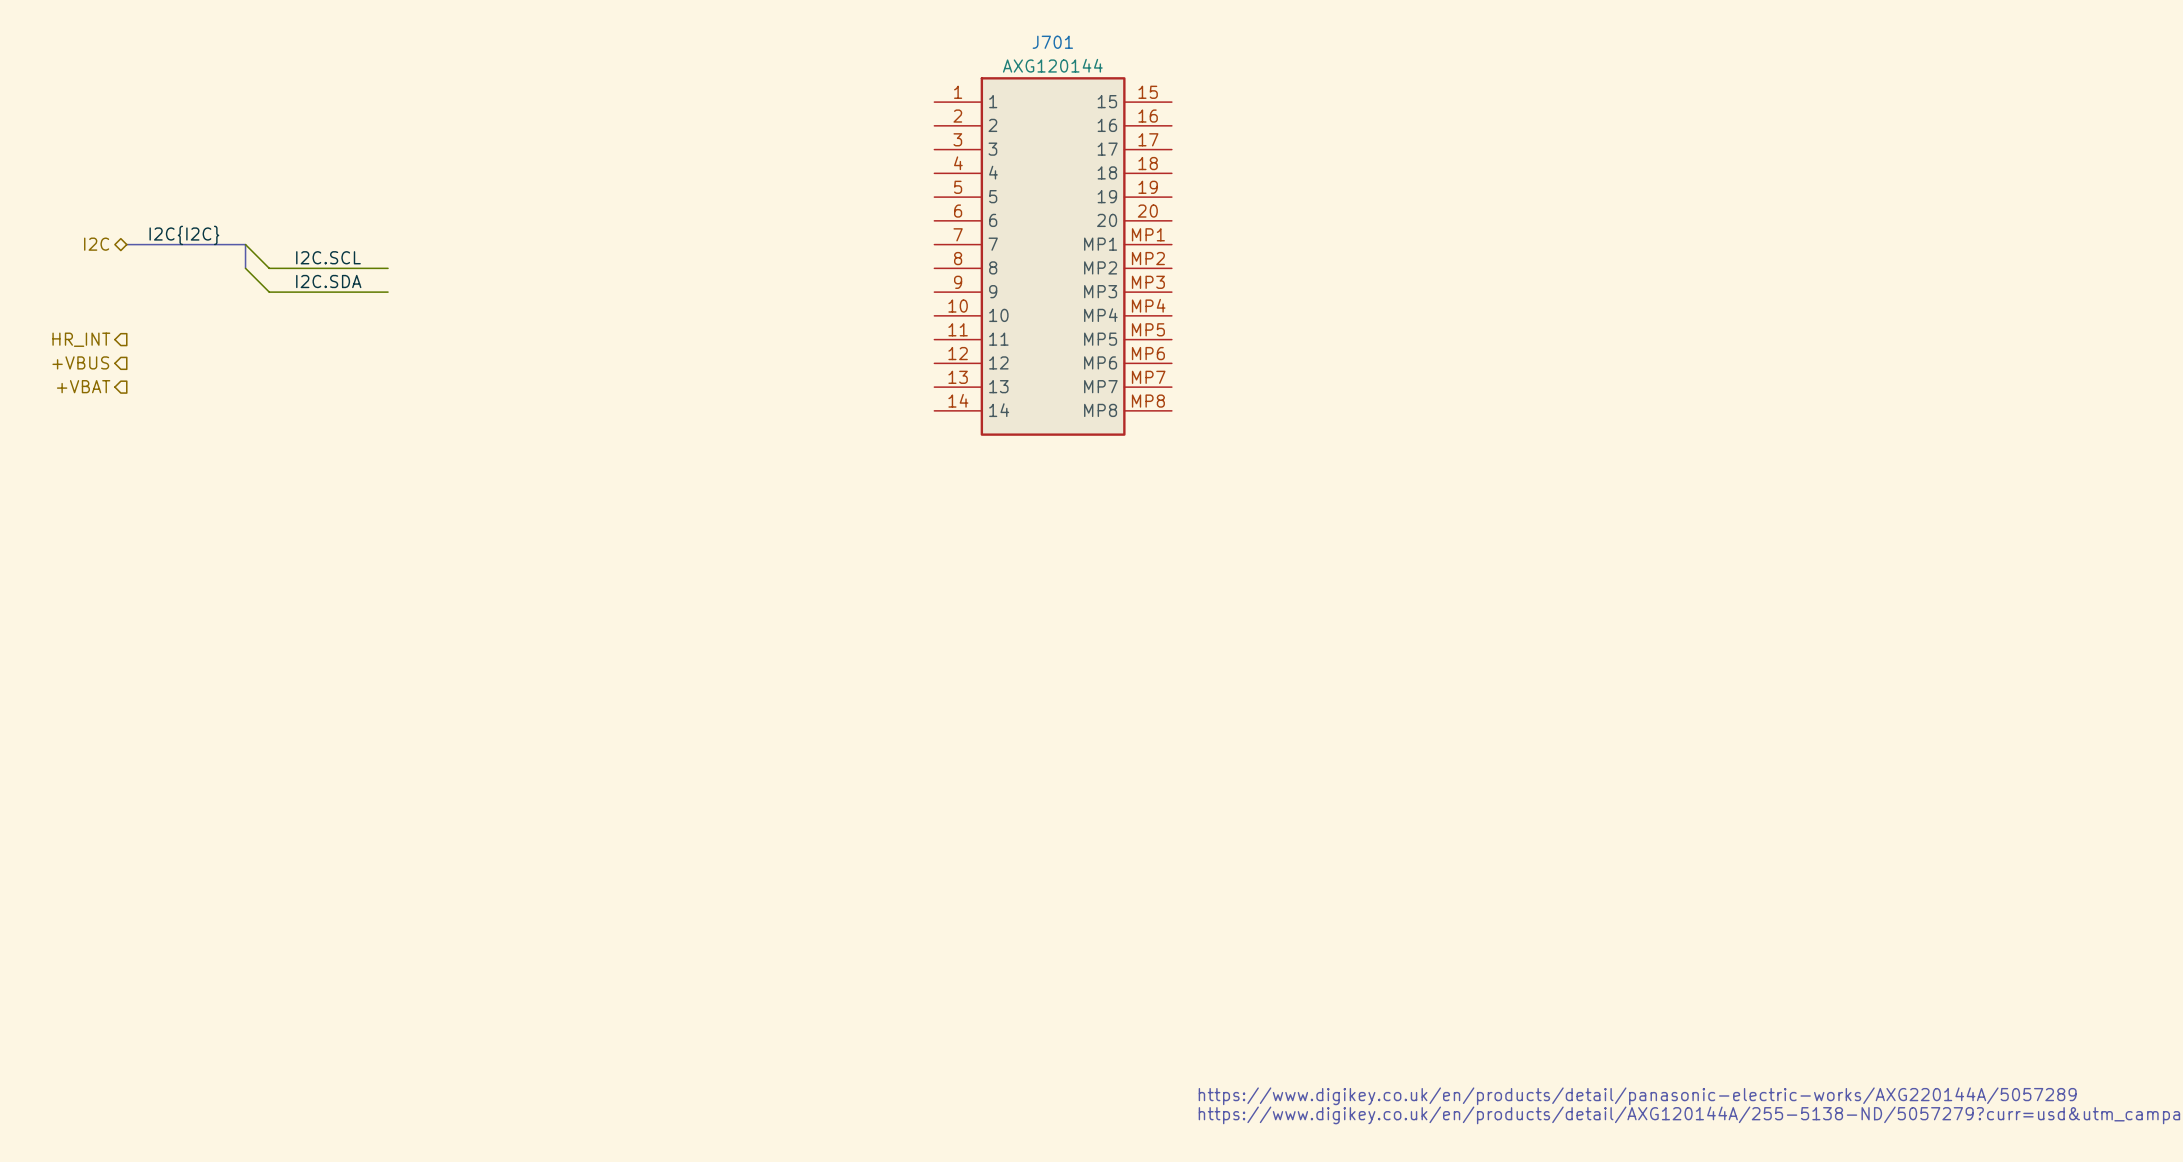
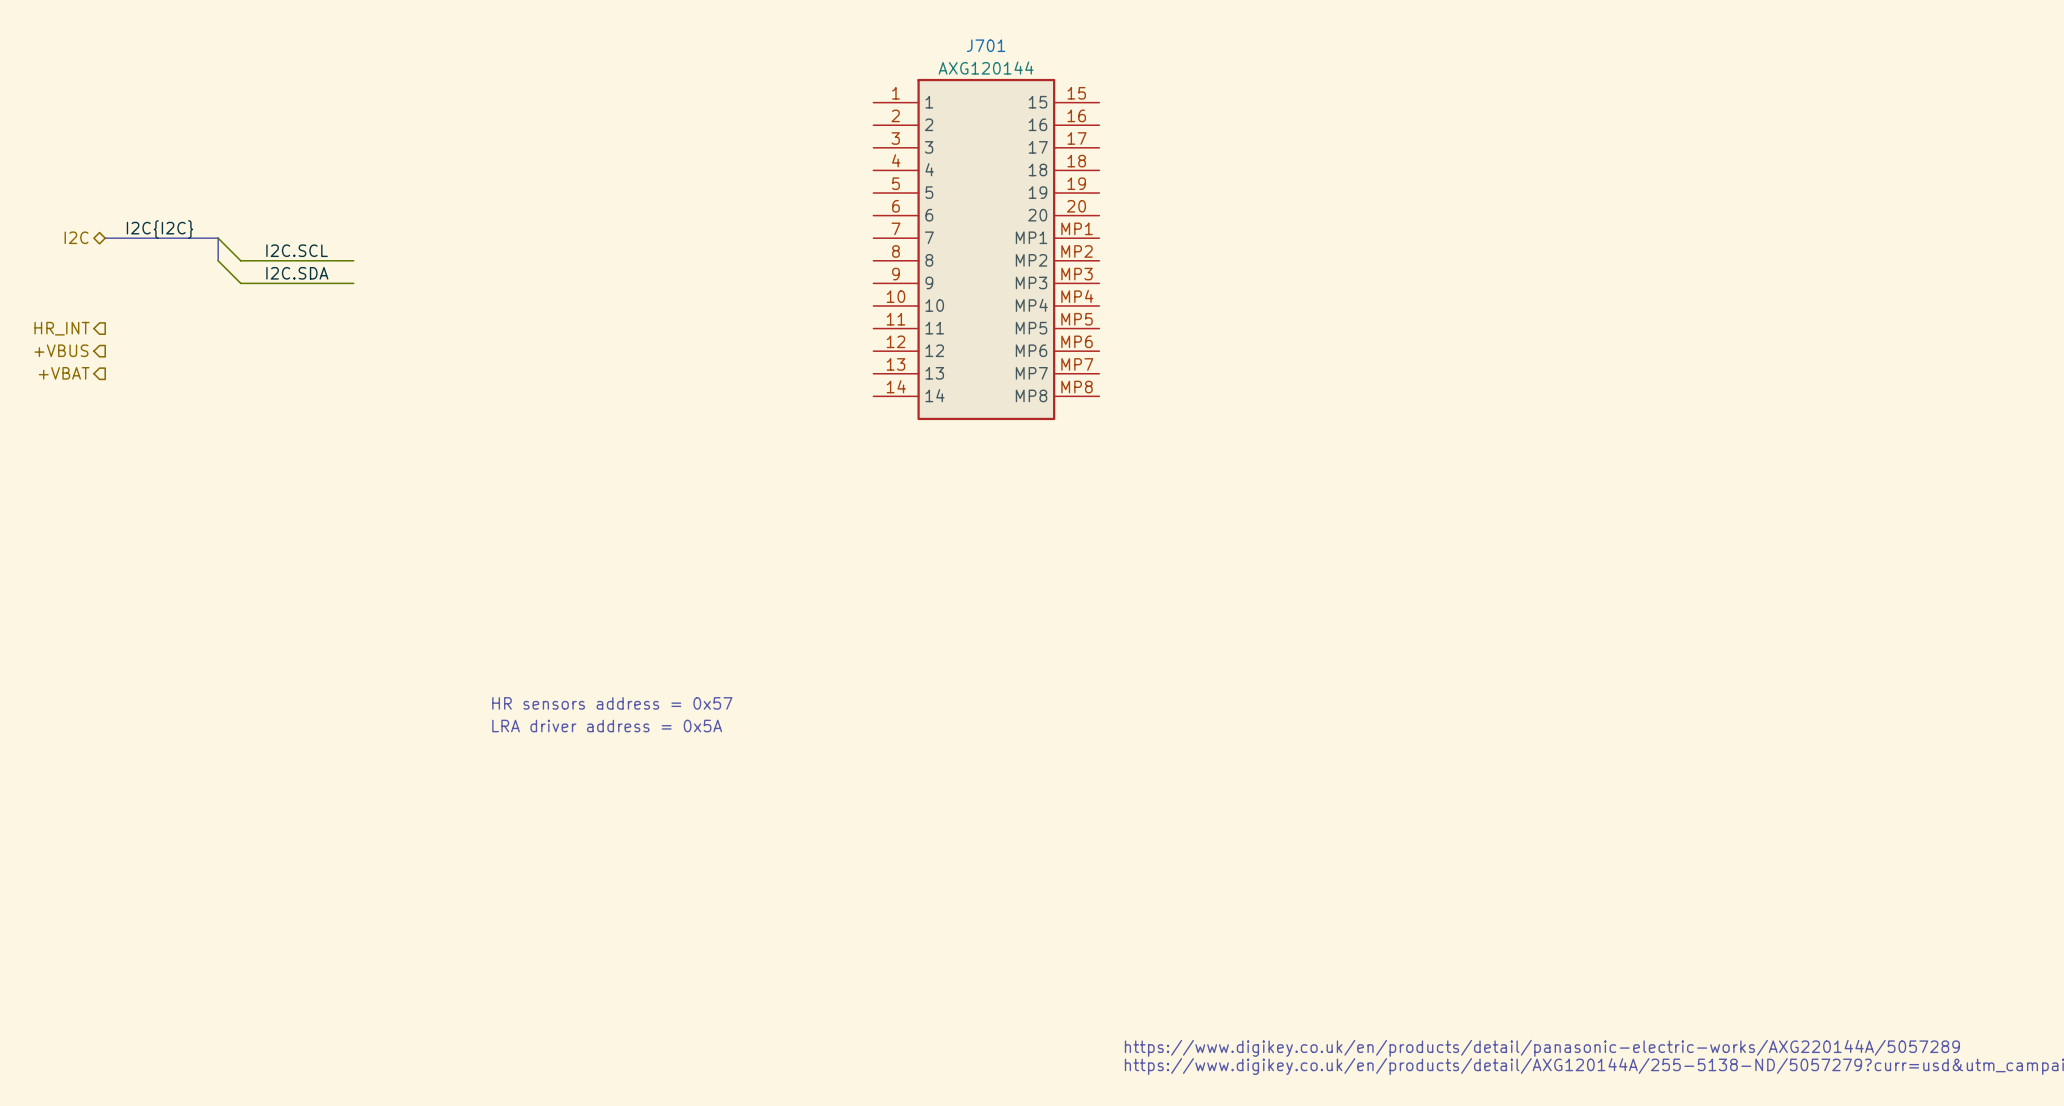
text: none -> HR sensors address = 0x57 (612, 703)
text: none -> LRA driver address = 0x5A (607, 726)

